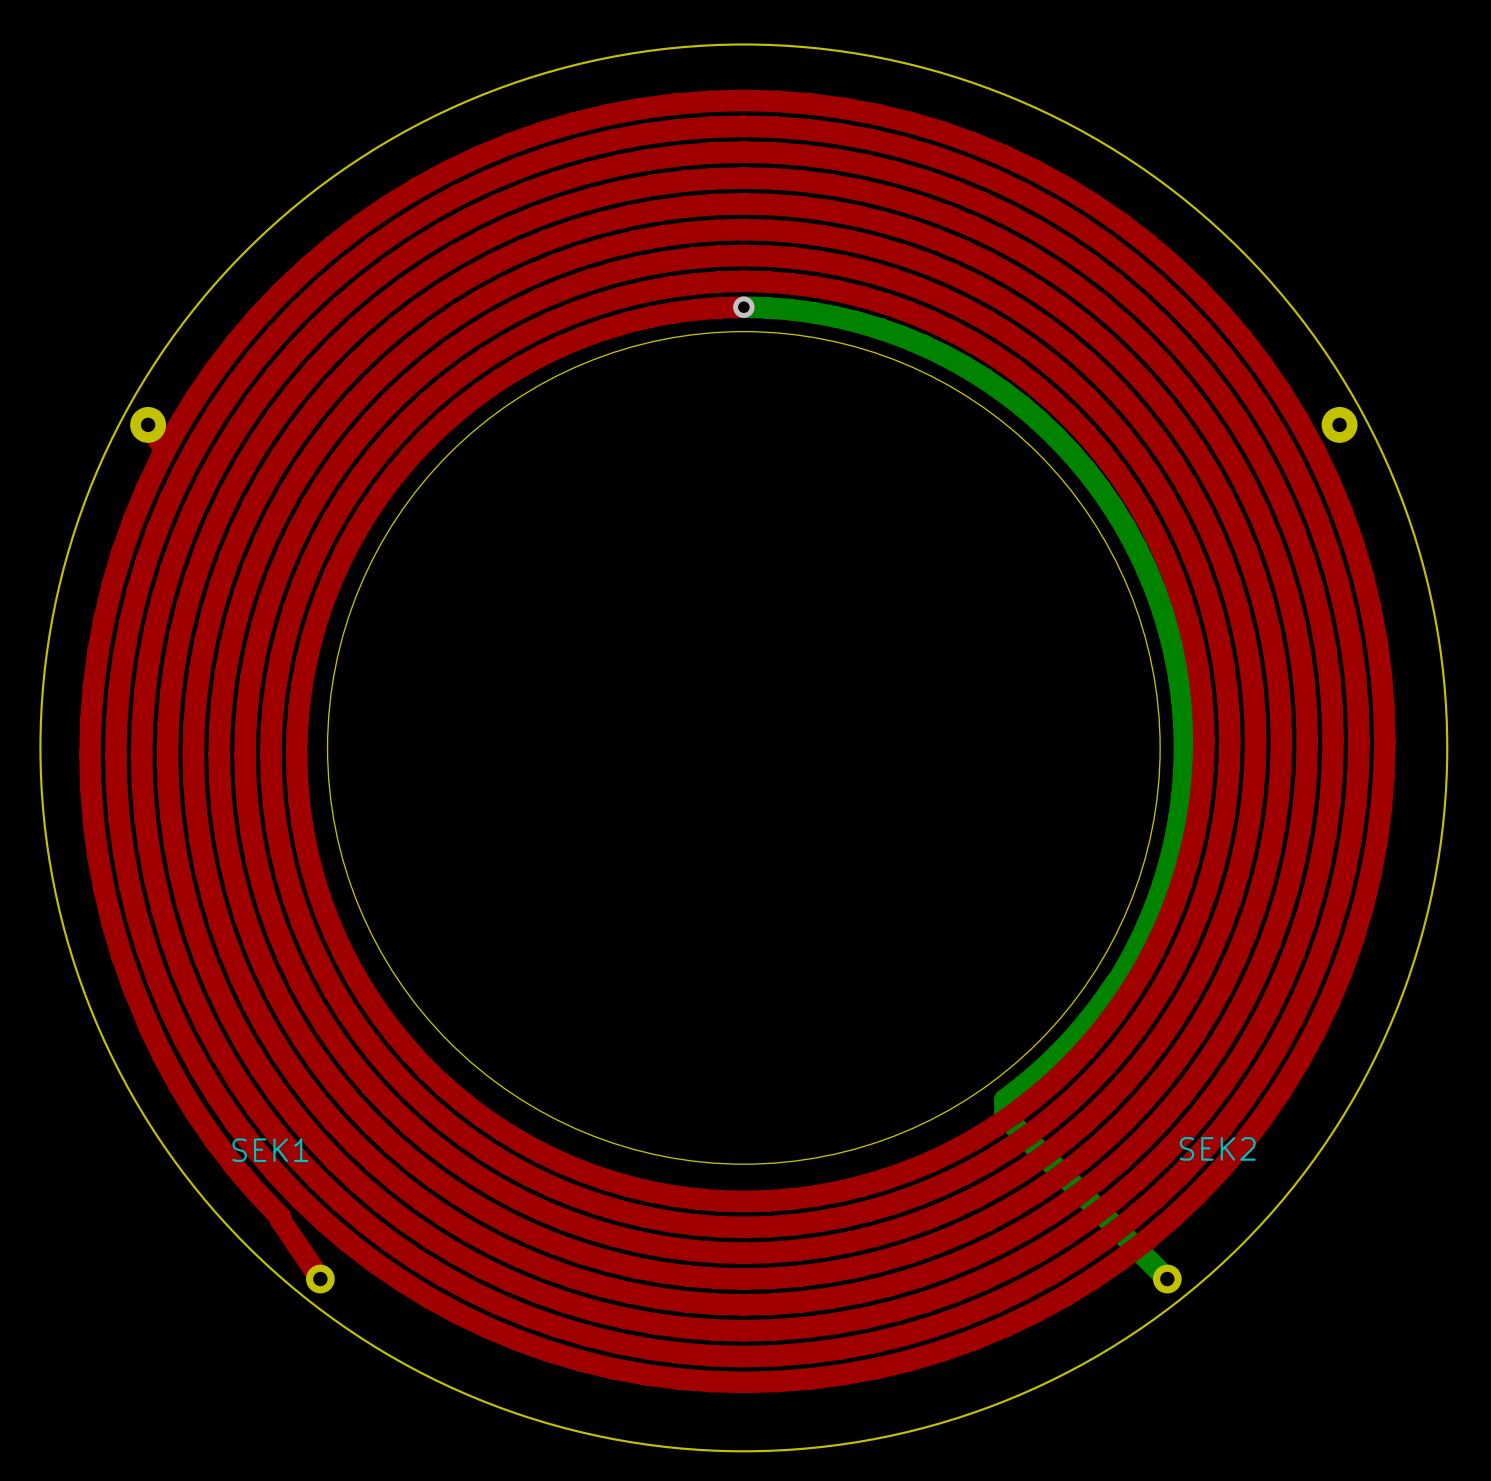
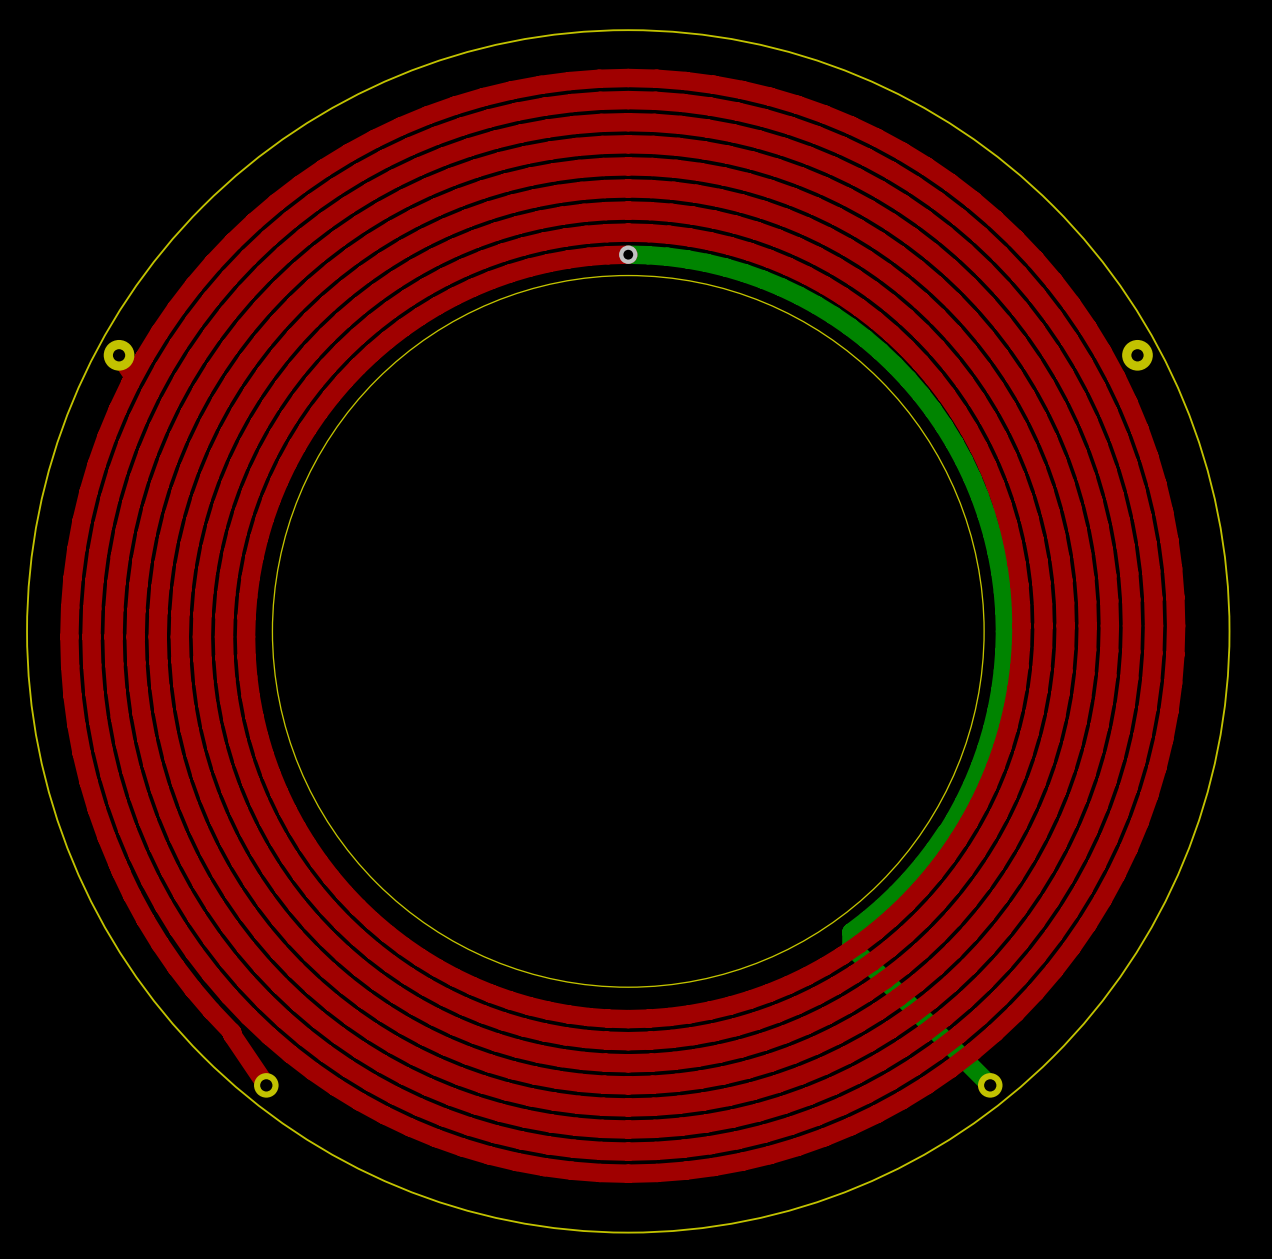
text: SEK2 (1217, 1148) -> none
text: SEK1 (270, 1150) -> none

